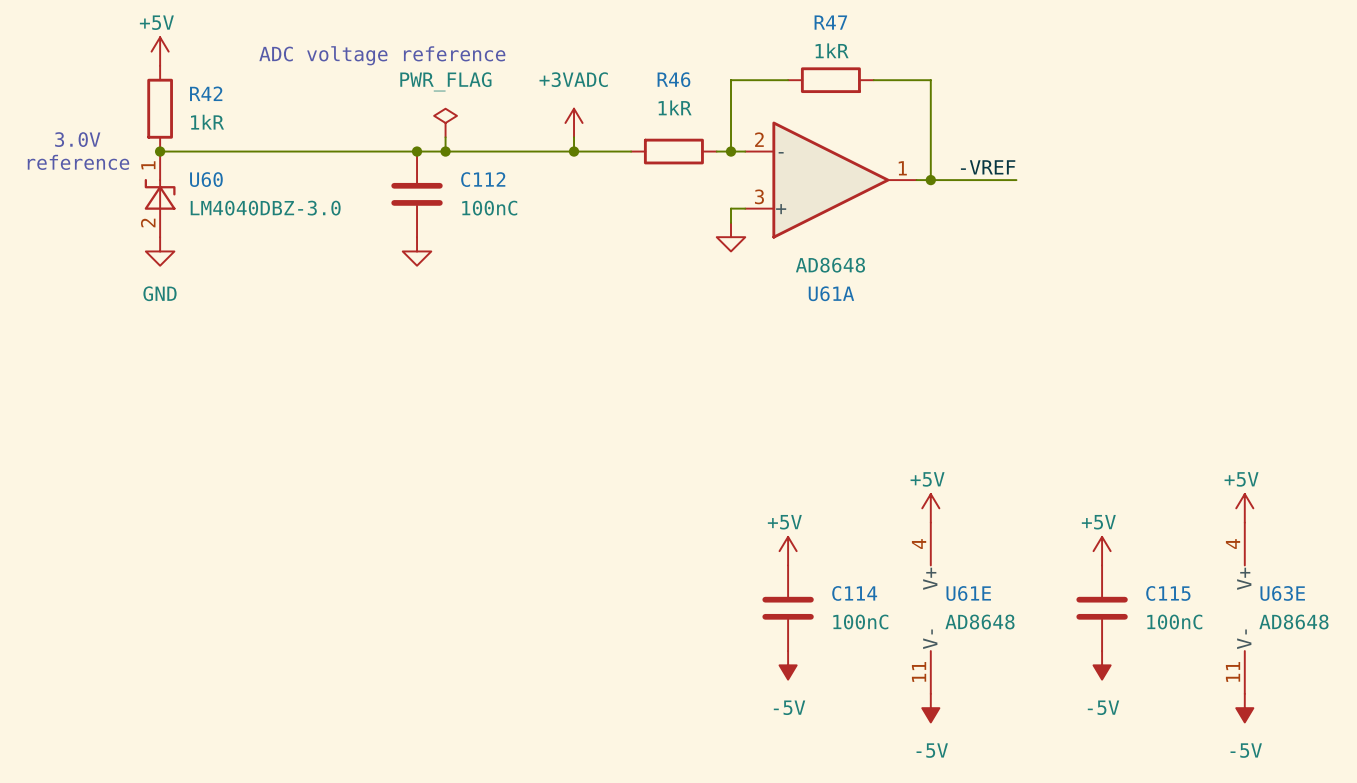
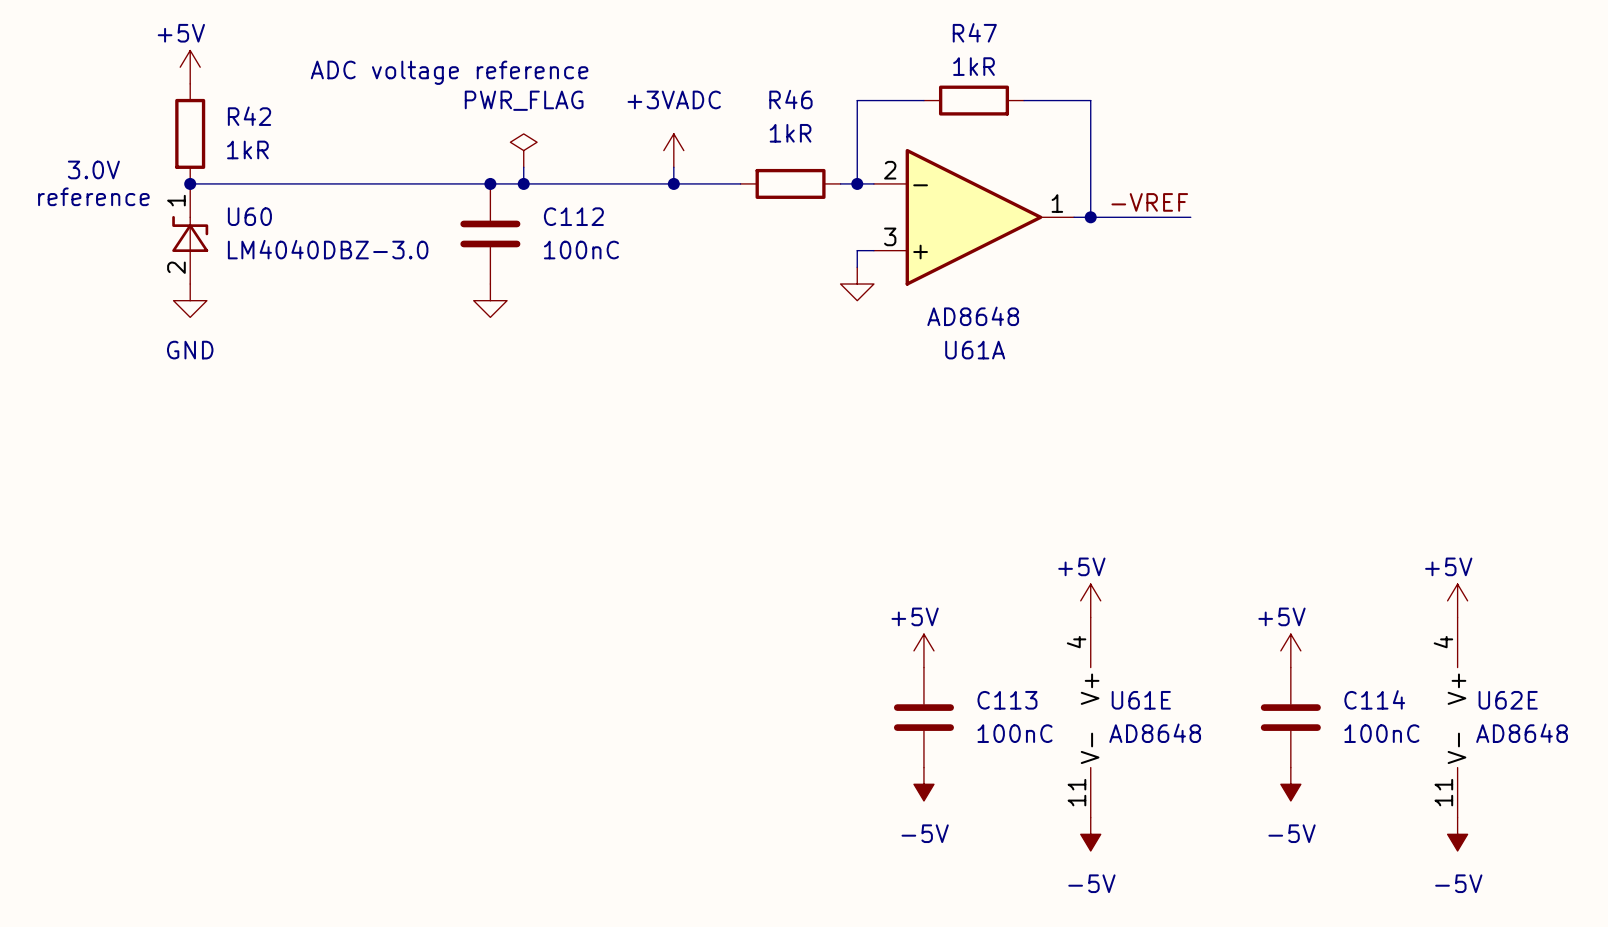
C114 name: C114 (854, 593) -> C113 (1007, 700)
C115 name: C115 (1168, 593) -> C114 (1374, 699)
U63E name: U63E (1282, 593) -> U62E (1508, 700)

